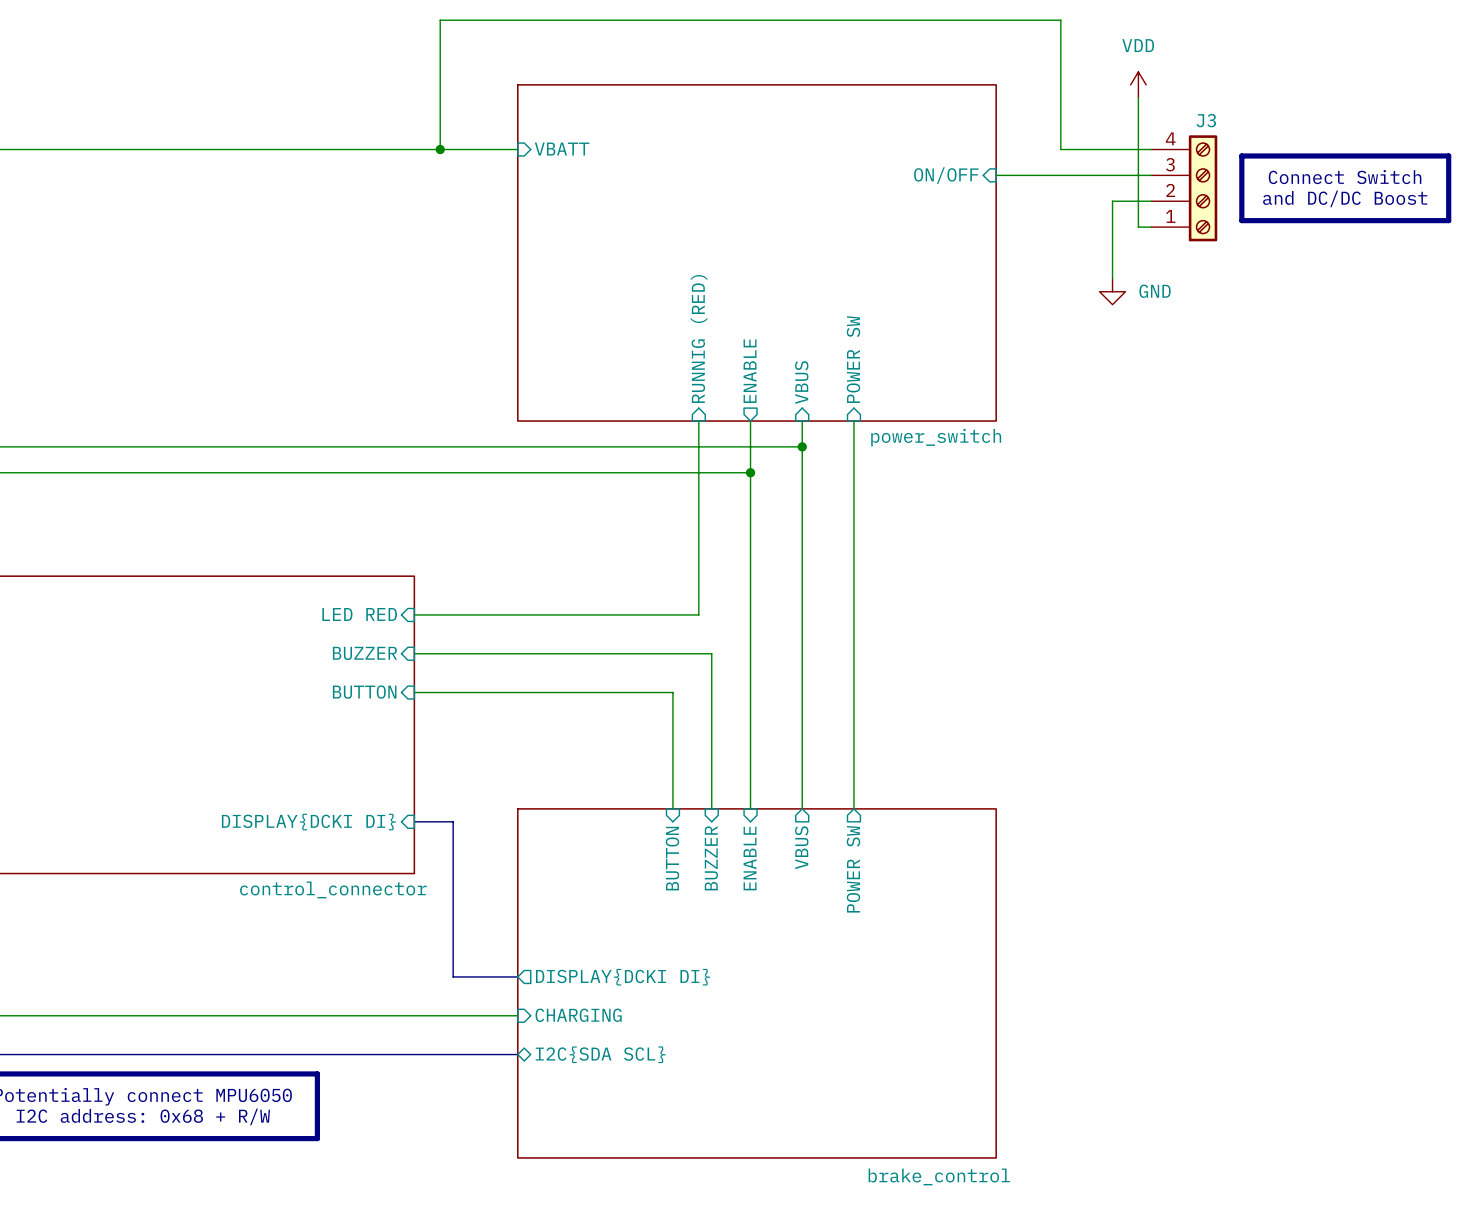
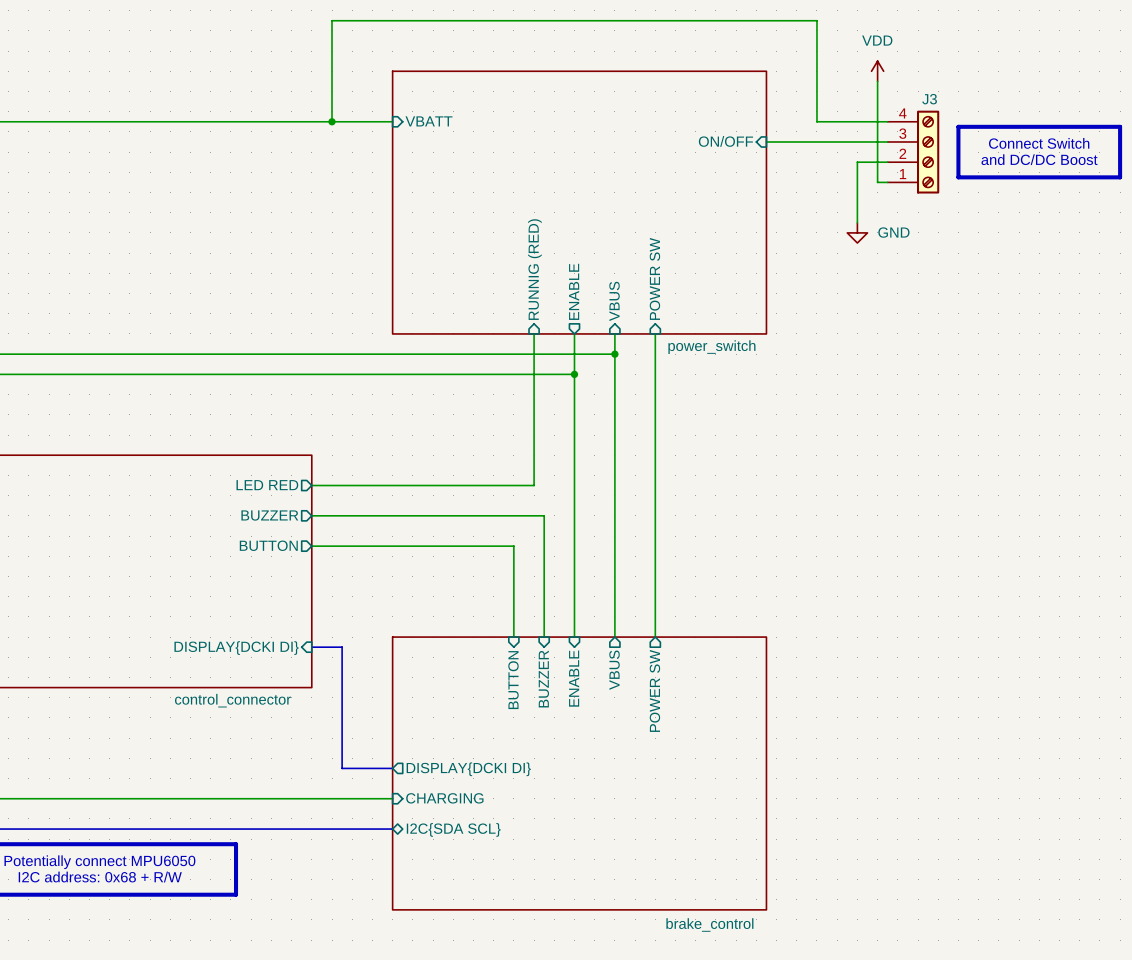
sheet pin shape: input (359, 614) -> output (267, 485)
sheet pin shape: input (364, 653) -> output (269, 515)
sheet pin shape: input (364, 692) -> output (268, 545)

